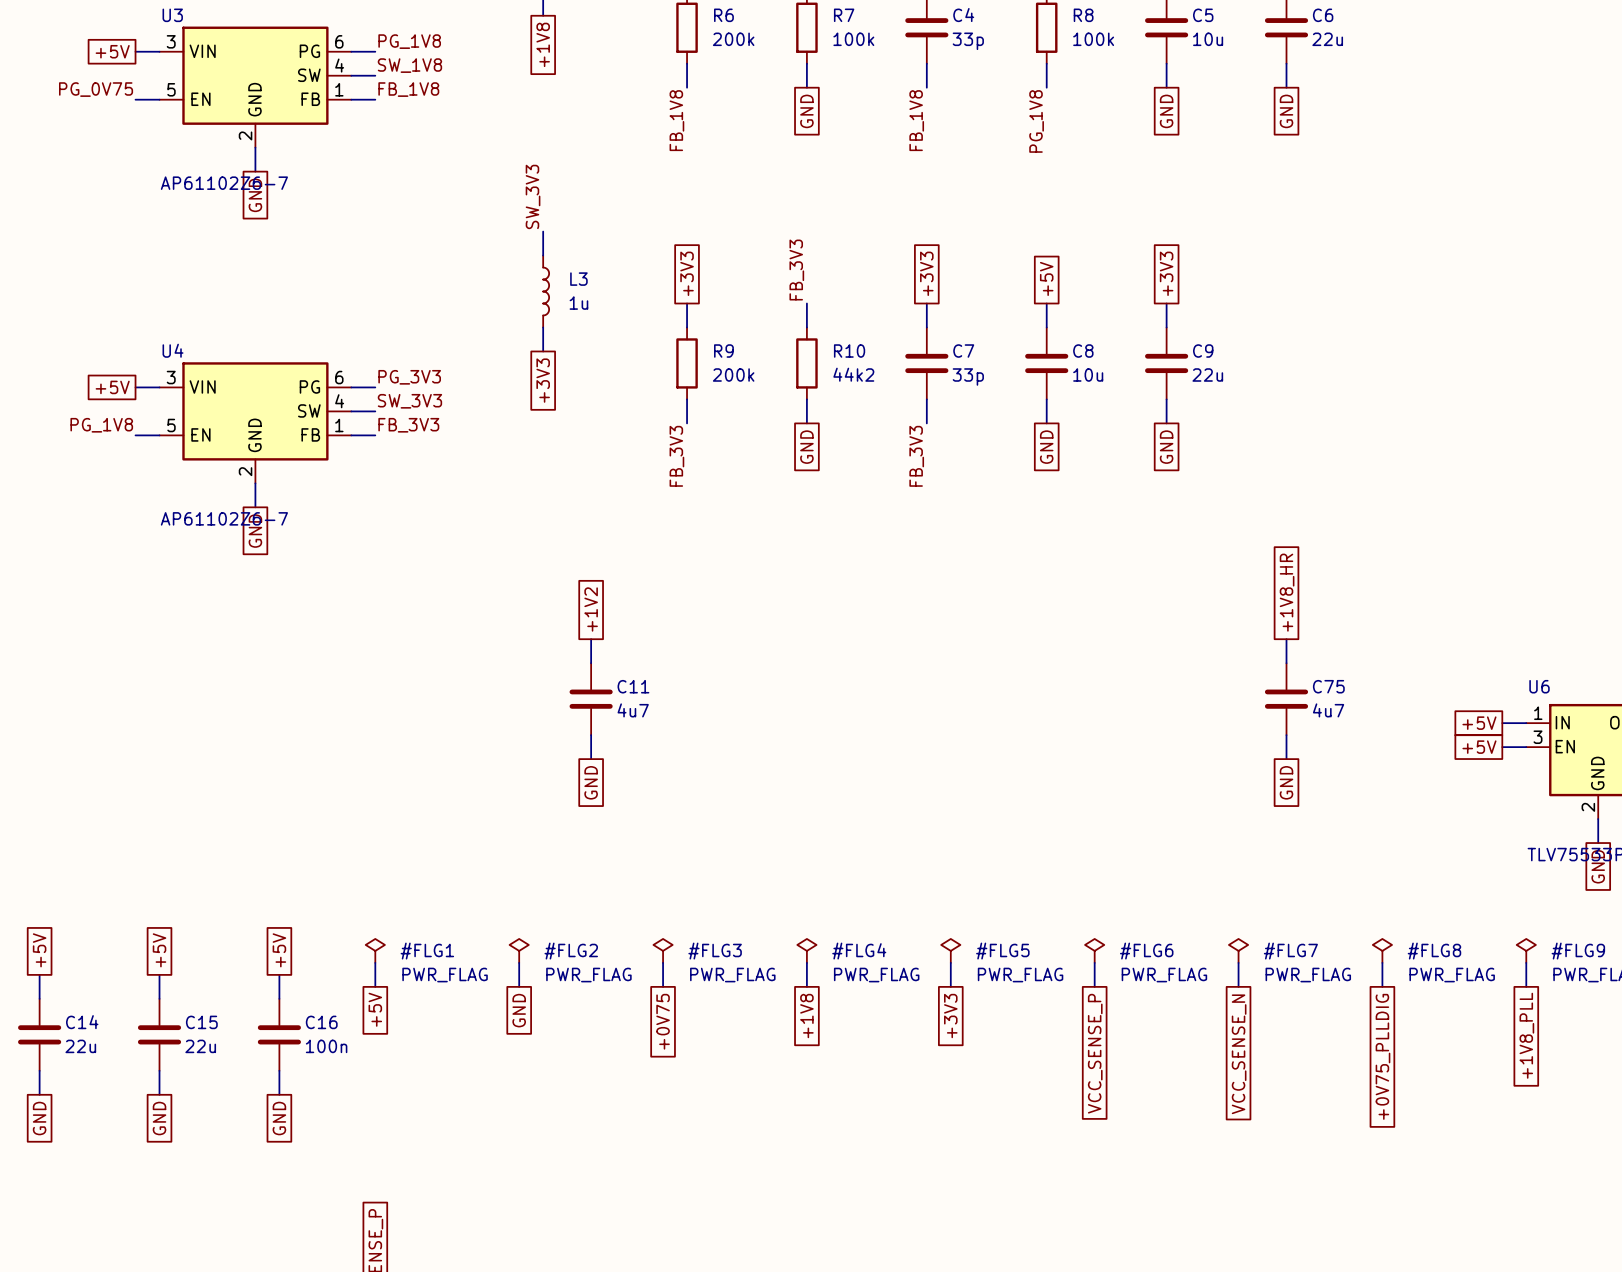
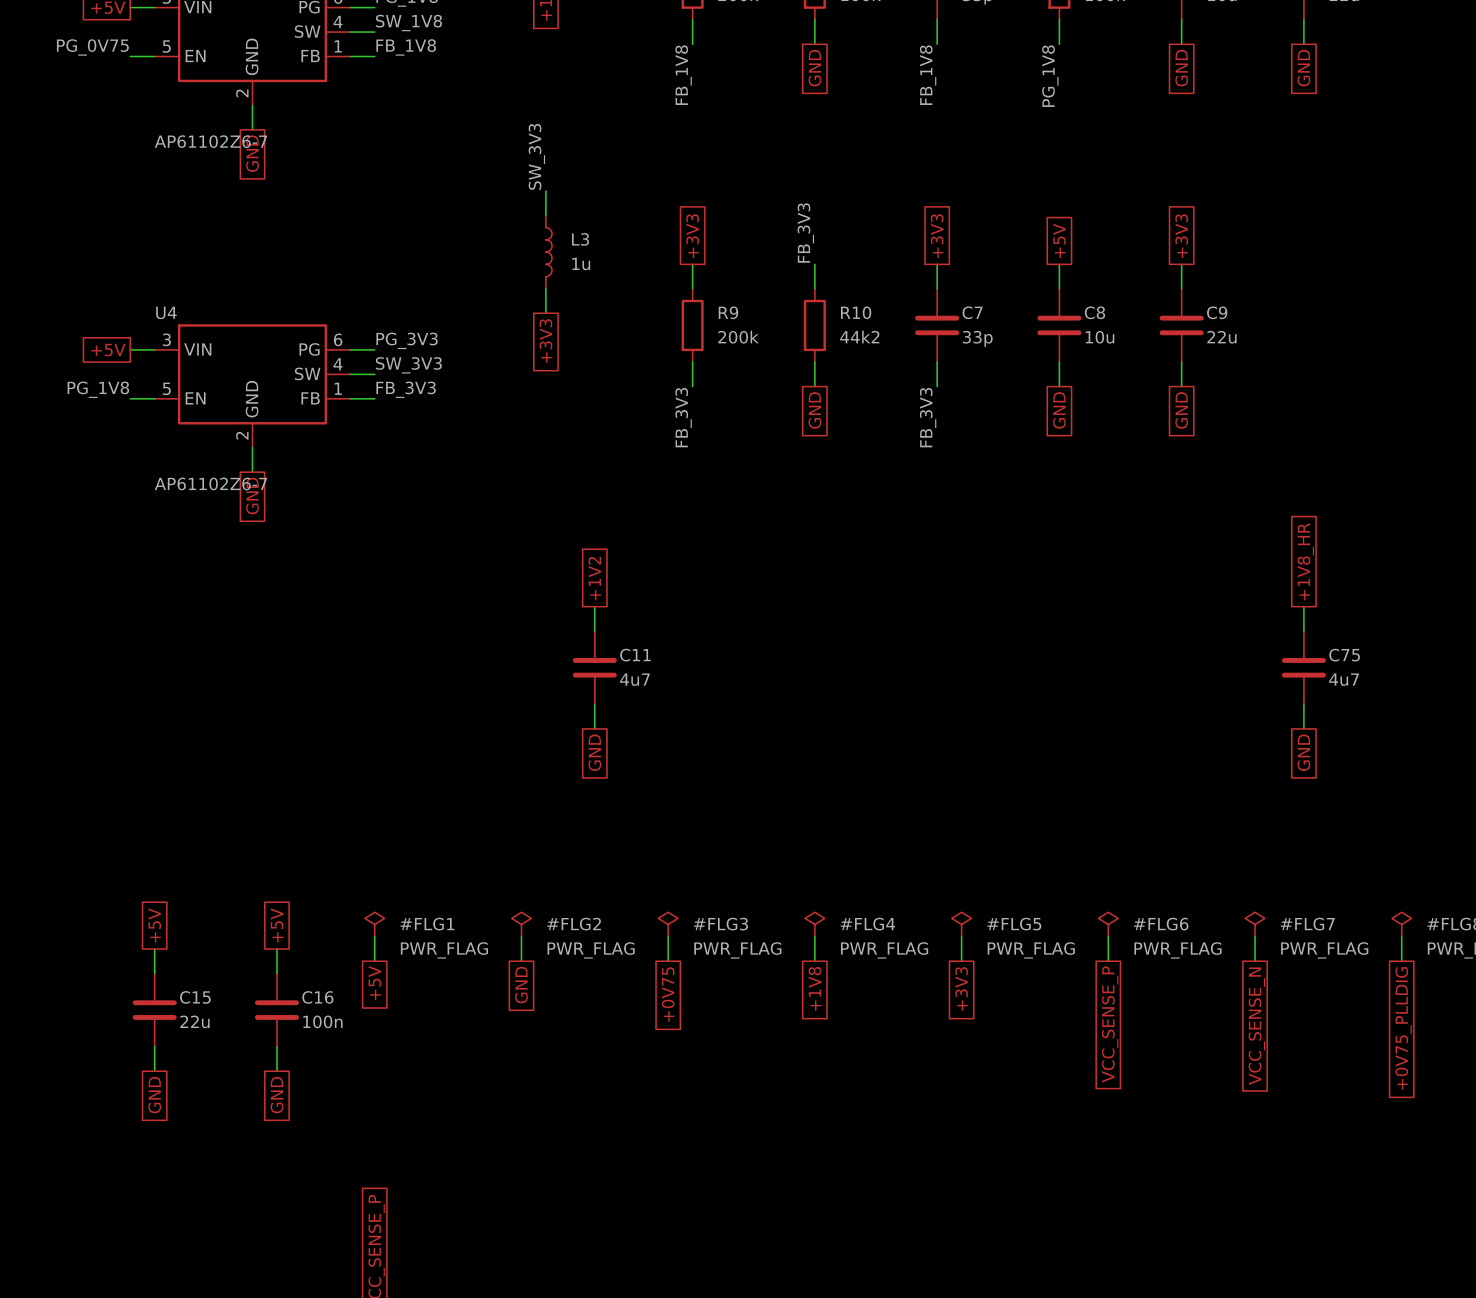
global label: +5V (39, 950) -> none
wire: (39, 974) (39, 998) -> none
C14: 22u (39, 1034) -> none
wire: (39, 1070) (39, 1094) -> none
global label: GND (39, 1118) -> none

